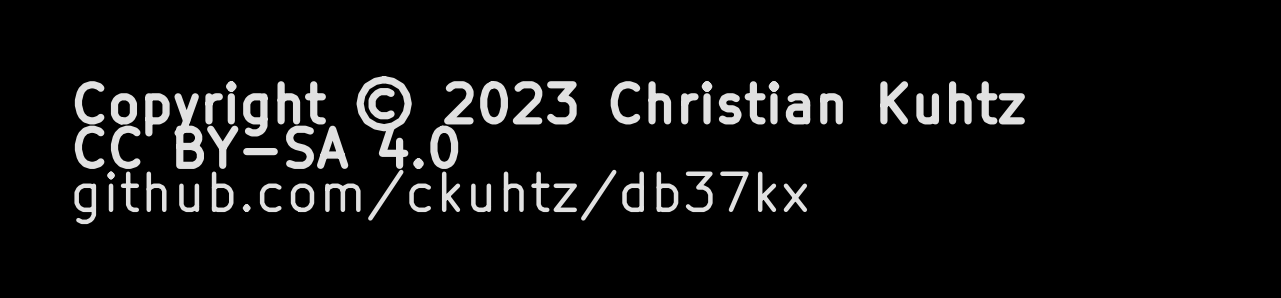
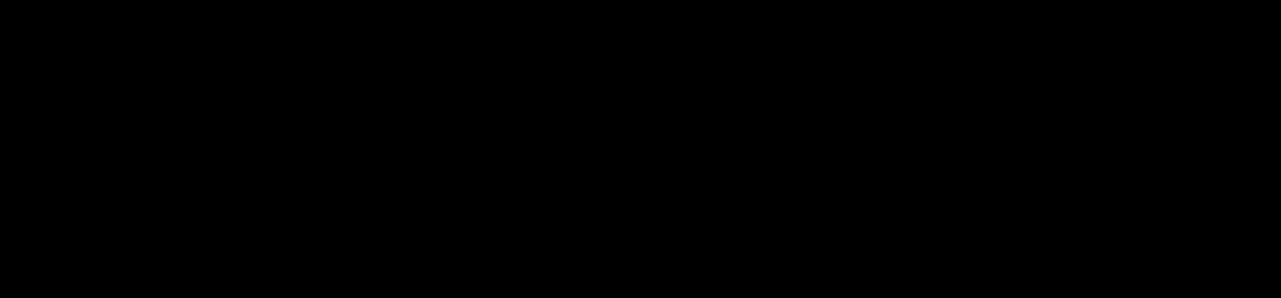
text: Copyright © 2023 Christian Kuhtz (549, 106) -> none
text: CC BY-SA 4.0 (266, 146) -> none
text: github.com/ckuhtz/db37kx (440, 196) -> none

